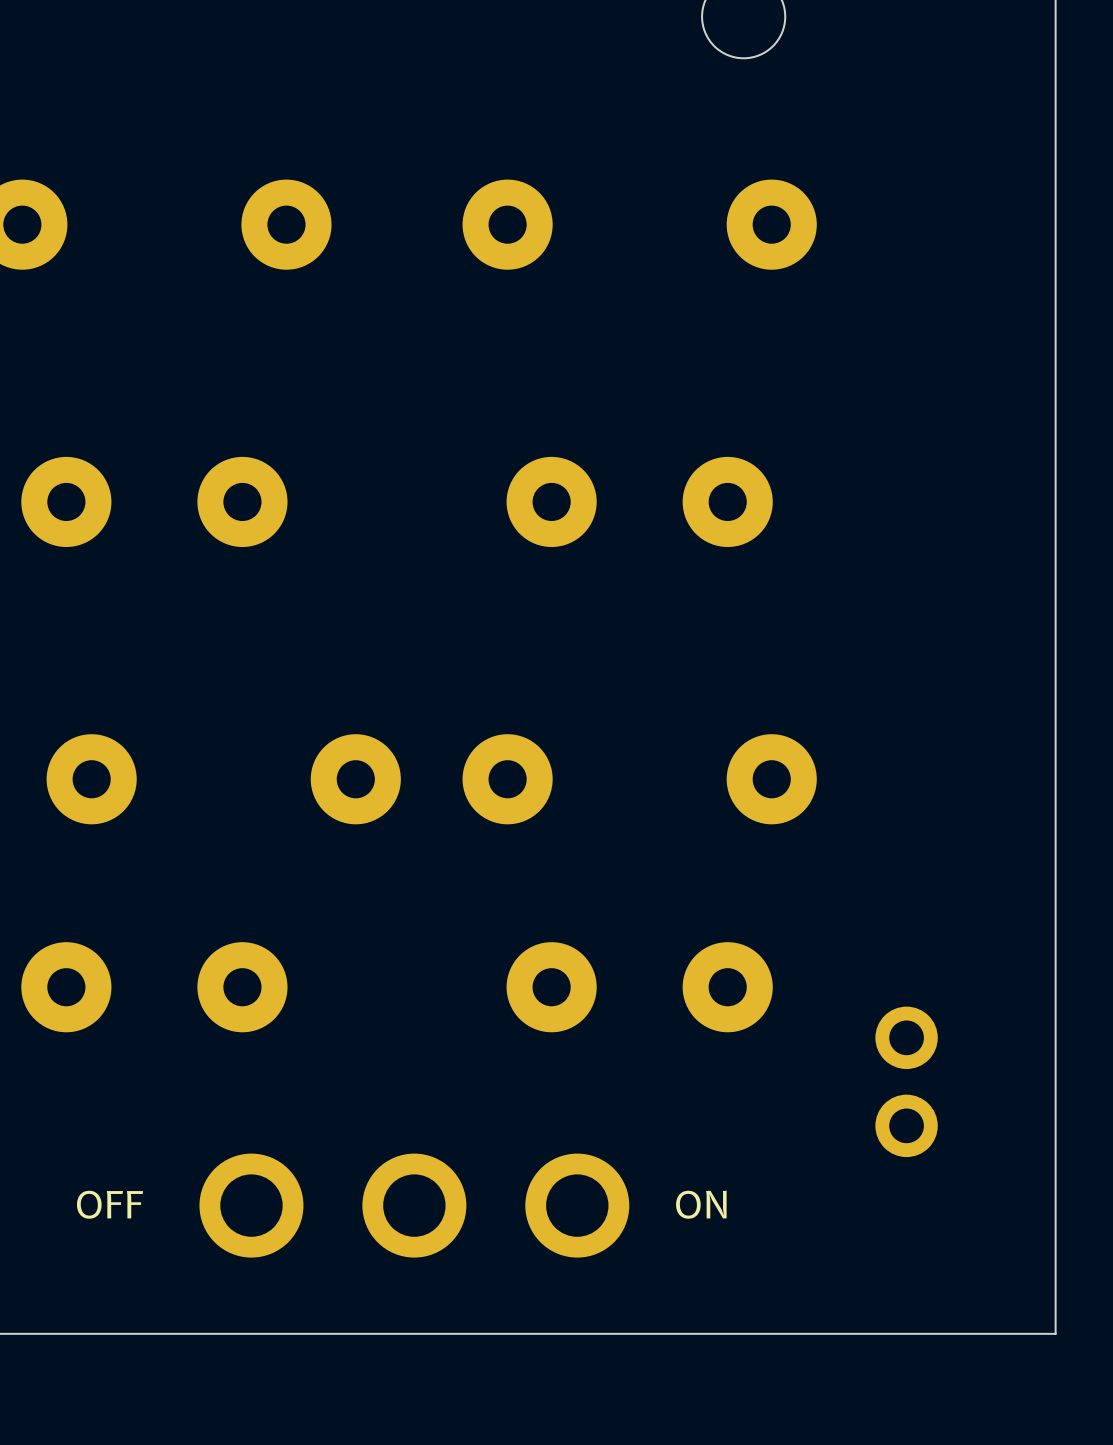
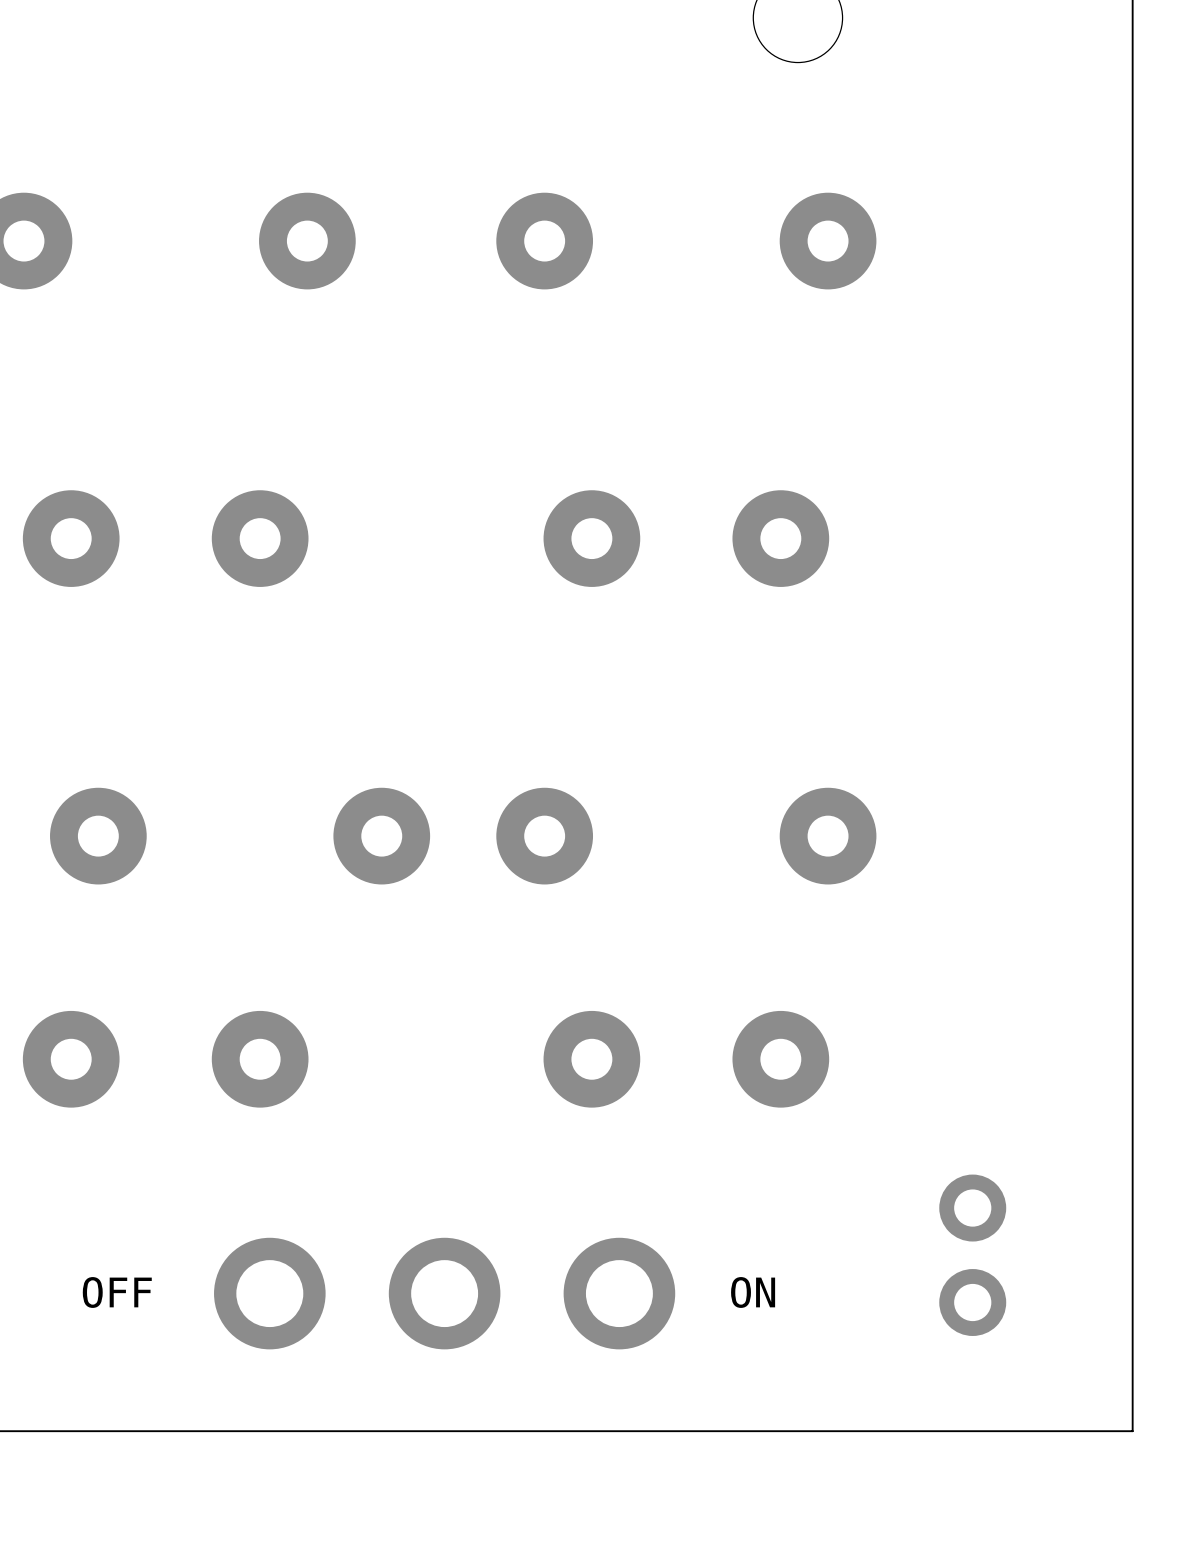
part position: (906, 1081) -> (972, 1255)

